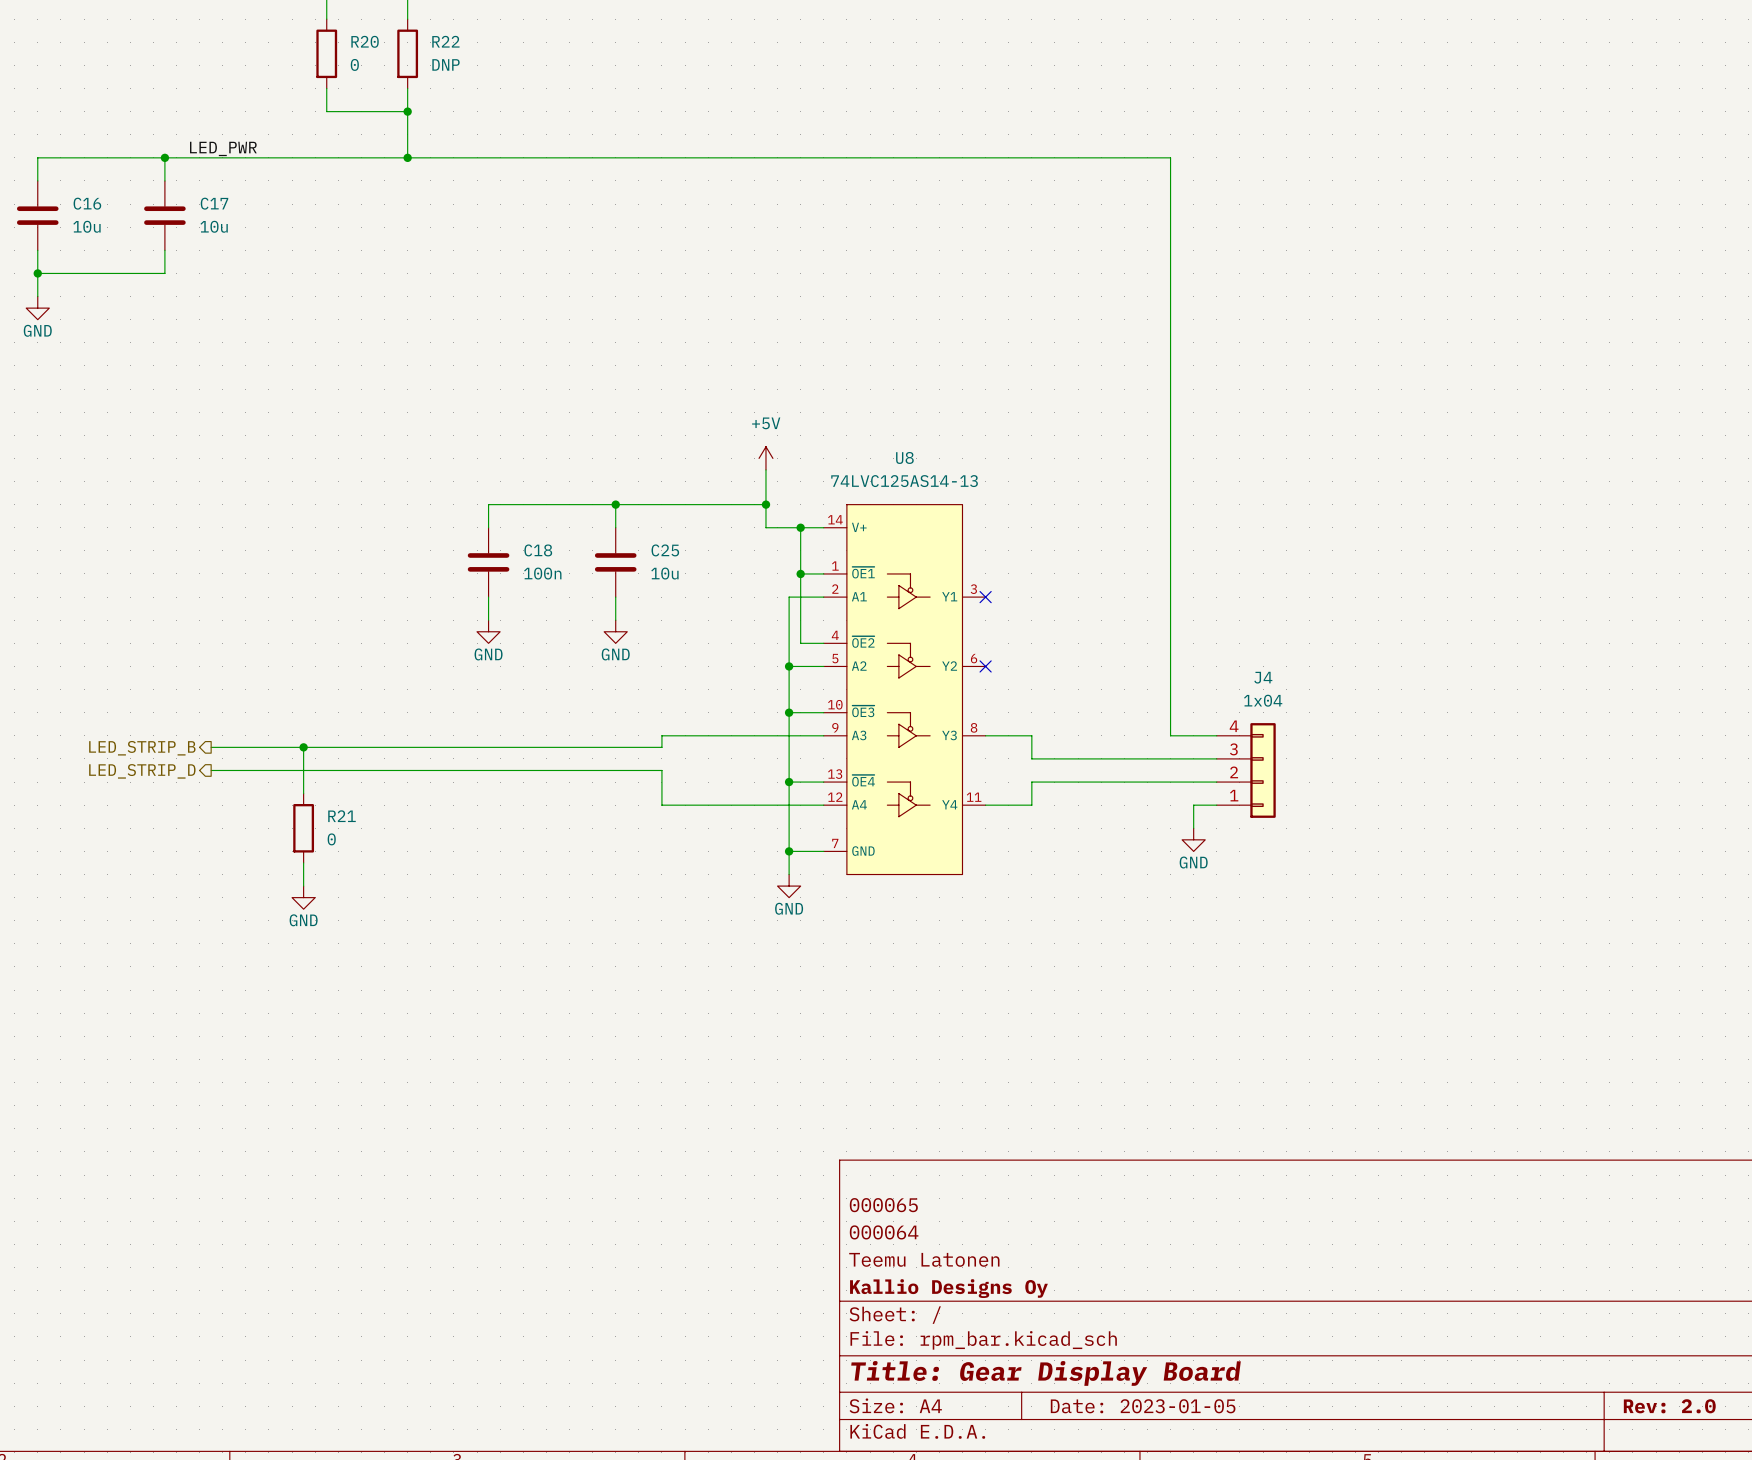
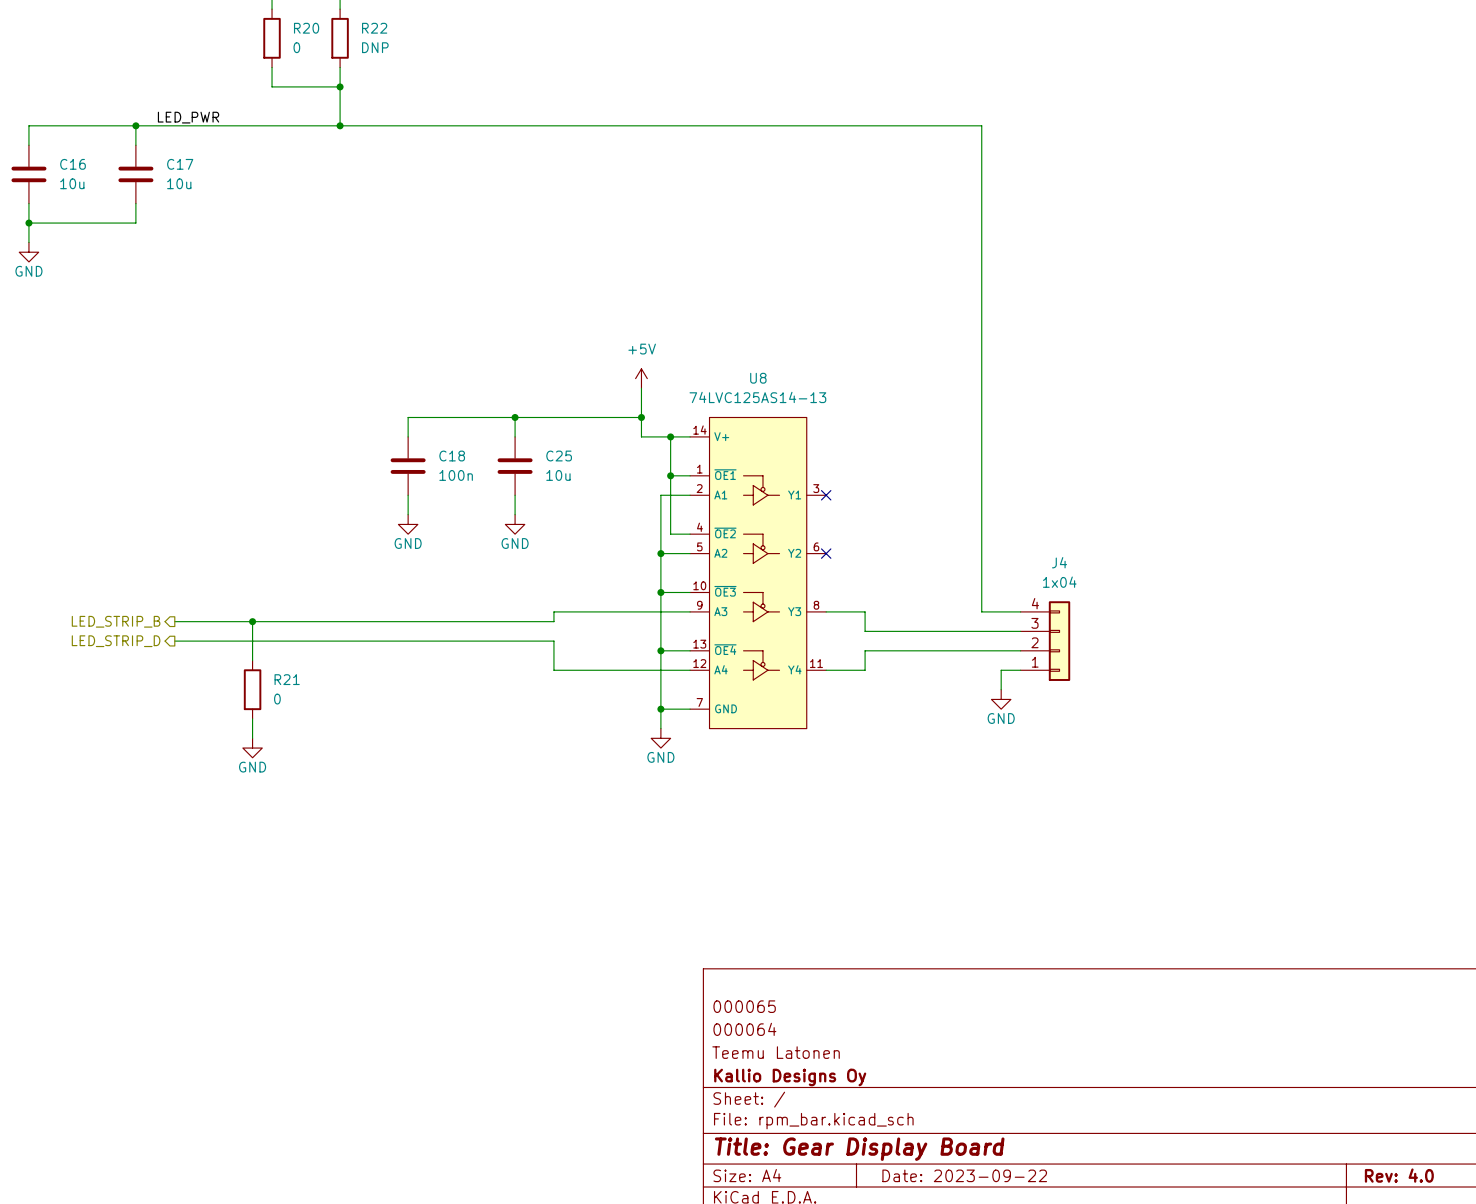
title block: Date: 2023-01-05 (1143, 1406) -> Date: 2023-09-22 (964, 1175)
title block: Rev: 2.0 (1669, 1406) -> Rev: 4.0 (1399, 1175)

